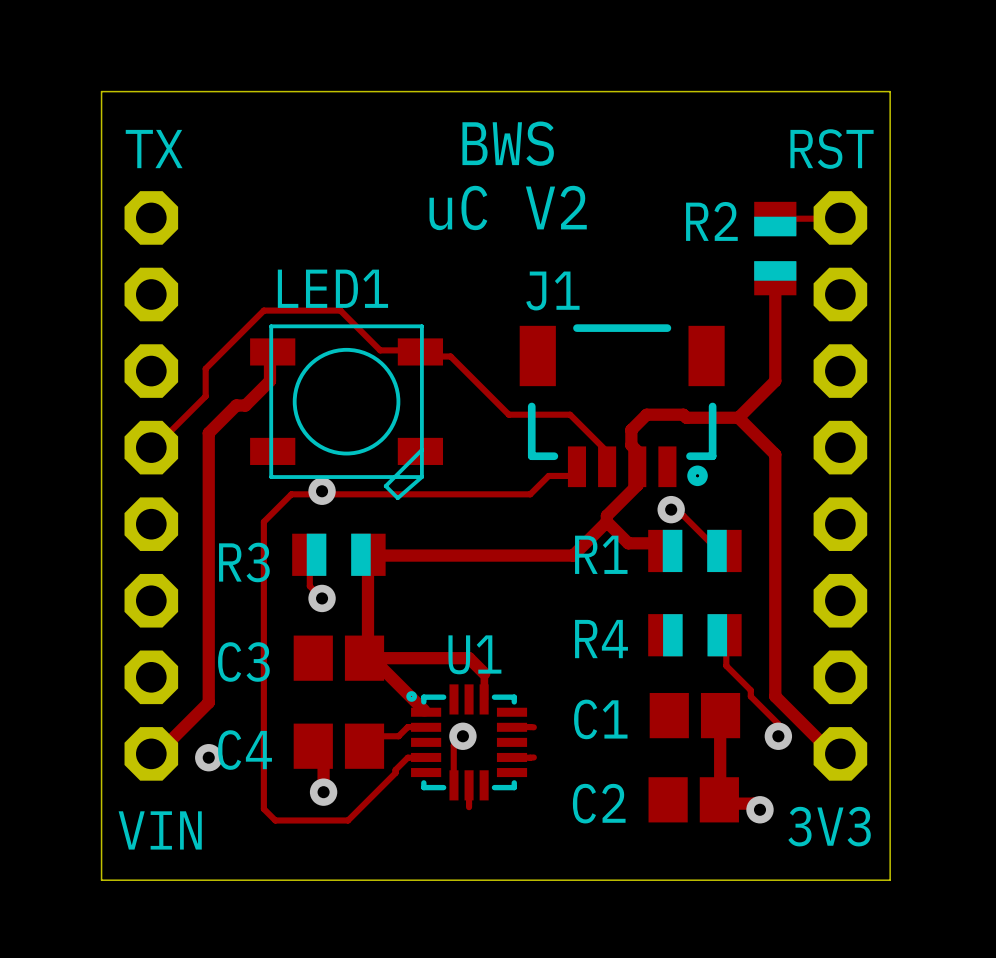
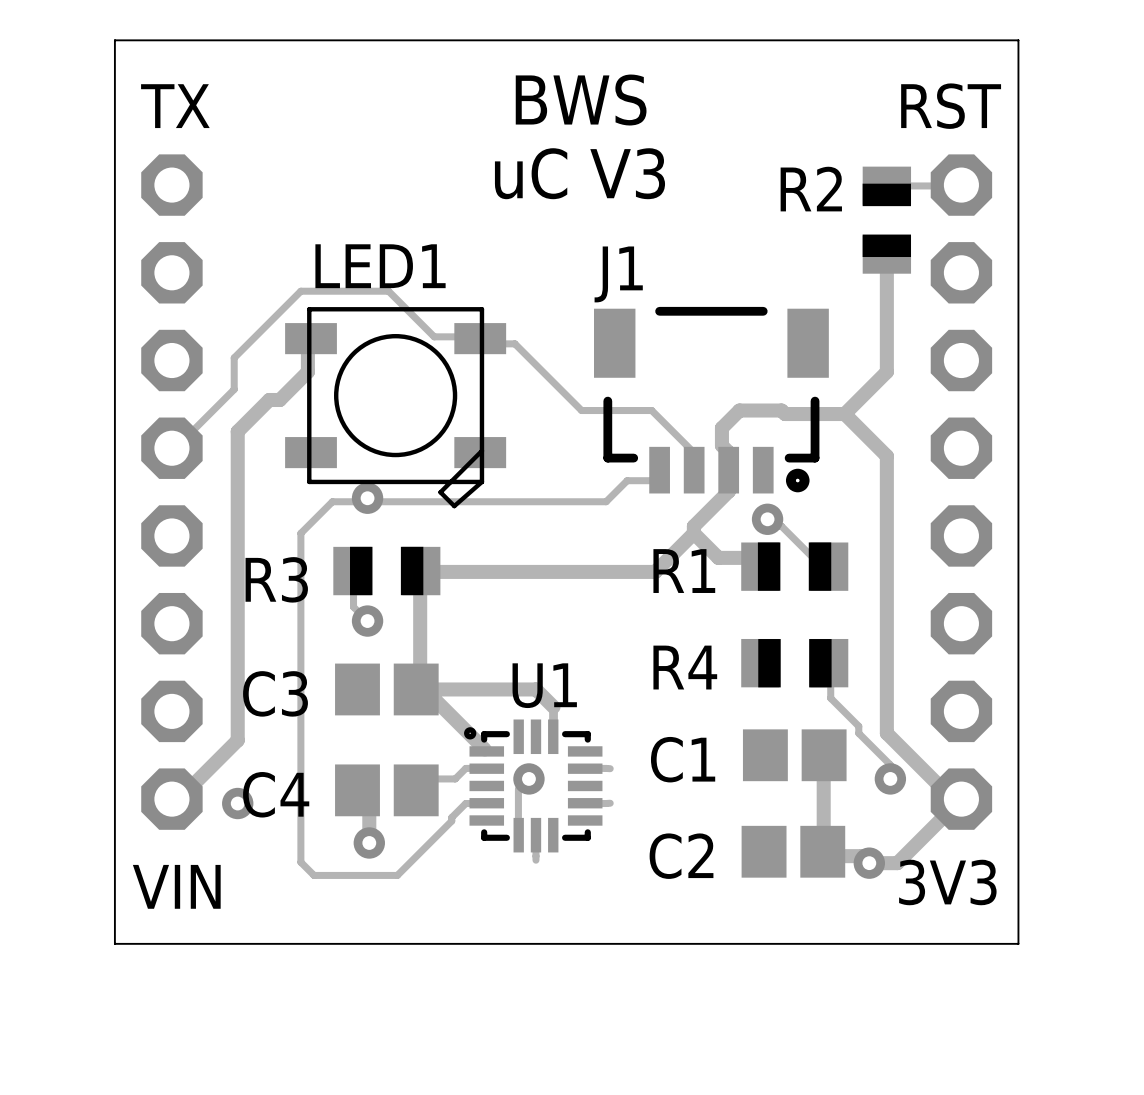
text: uC V2 (508, 207) -> uC V3 (579, 173)
track: none -> (961, 799) (897, 863) (869, 863)

